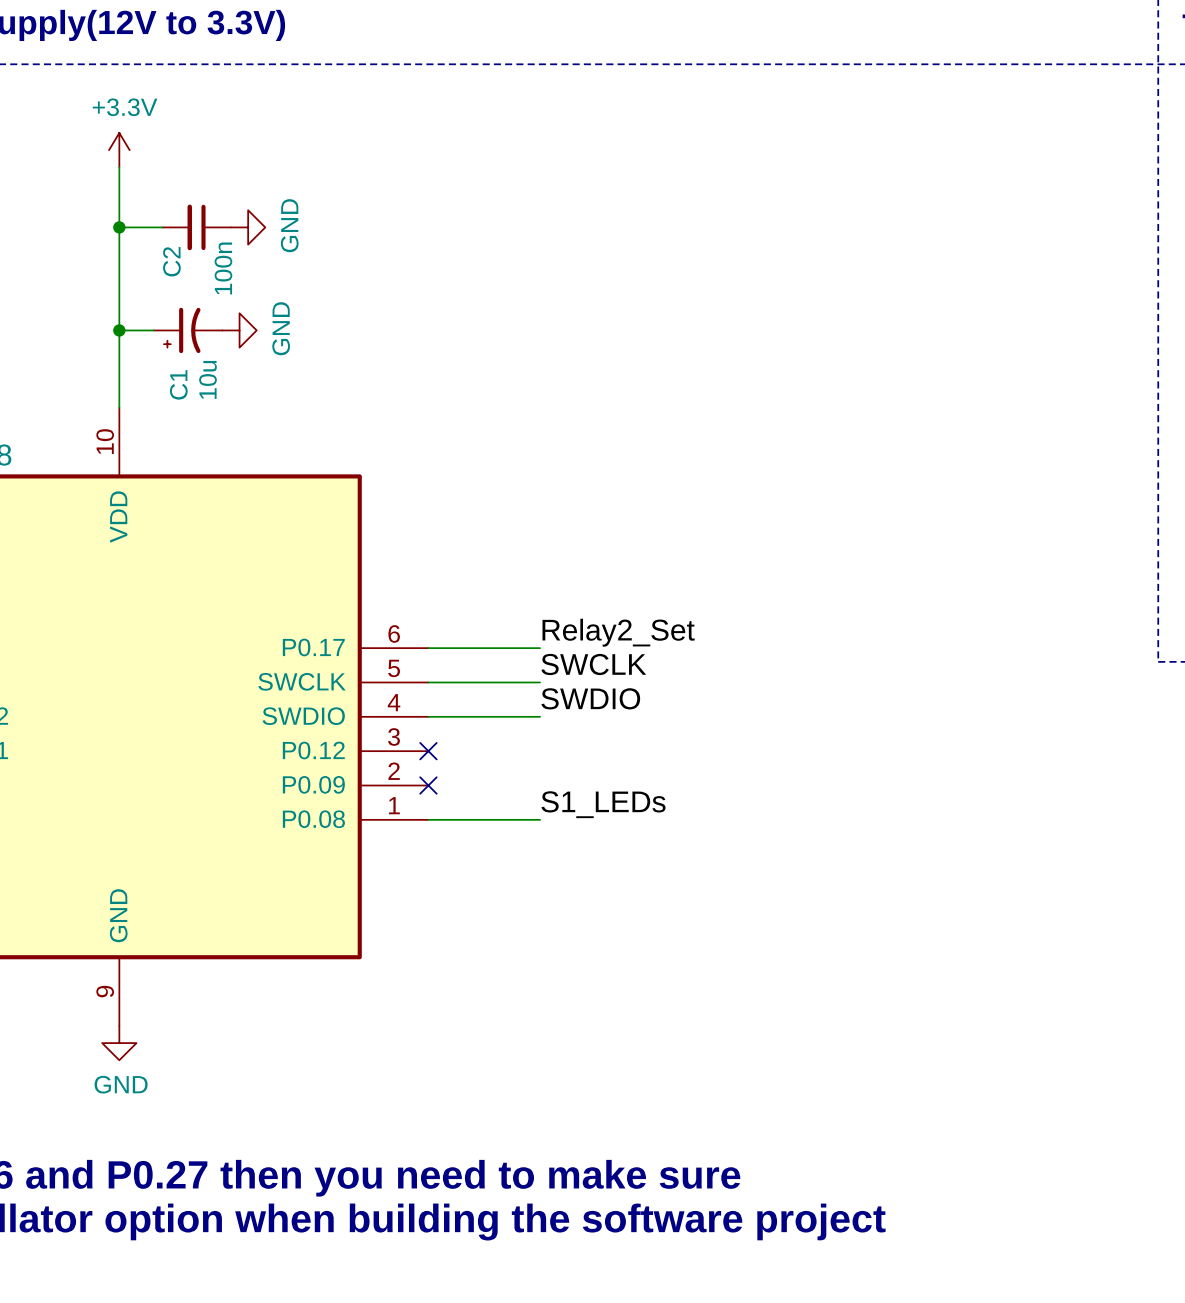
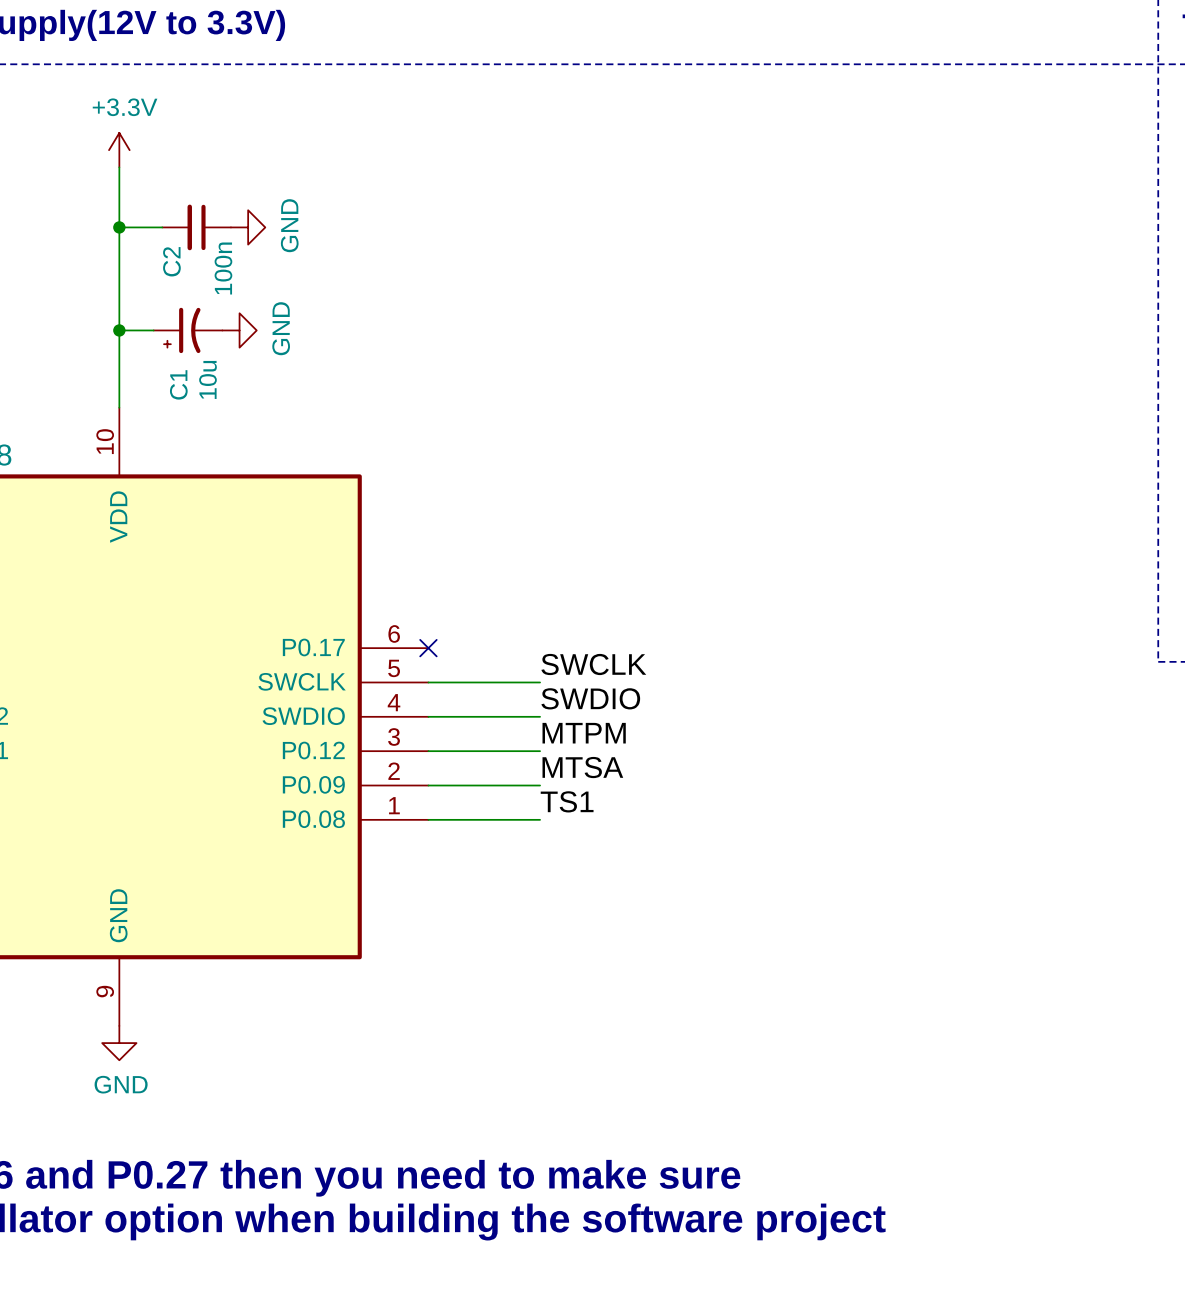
label: Relay2_Set (618, 632) -> none
wire: (428, 648) (540, 648) -> (428, 751) (540, 751)
no-connect mark: none -> (428, 648)
label: none -> MTPM (584, 733)
no-connect mark: (428, 751) -> none
label: none -> MTSA (582, 767)
wire: none -> (428, 785) (540, 785)
no-connect mark: (428, 785) -> none
label: S1_LEDs (603, 804) -> TS1 (567, 801)

